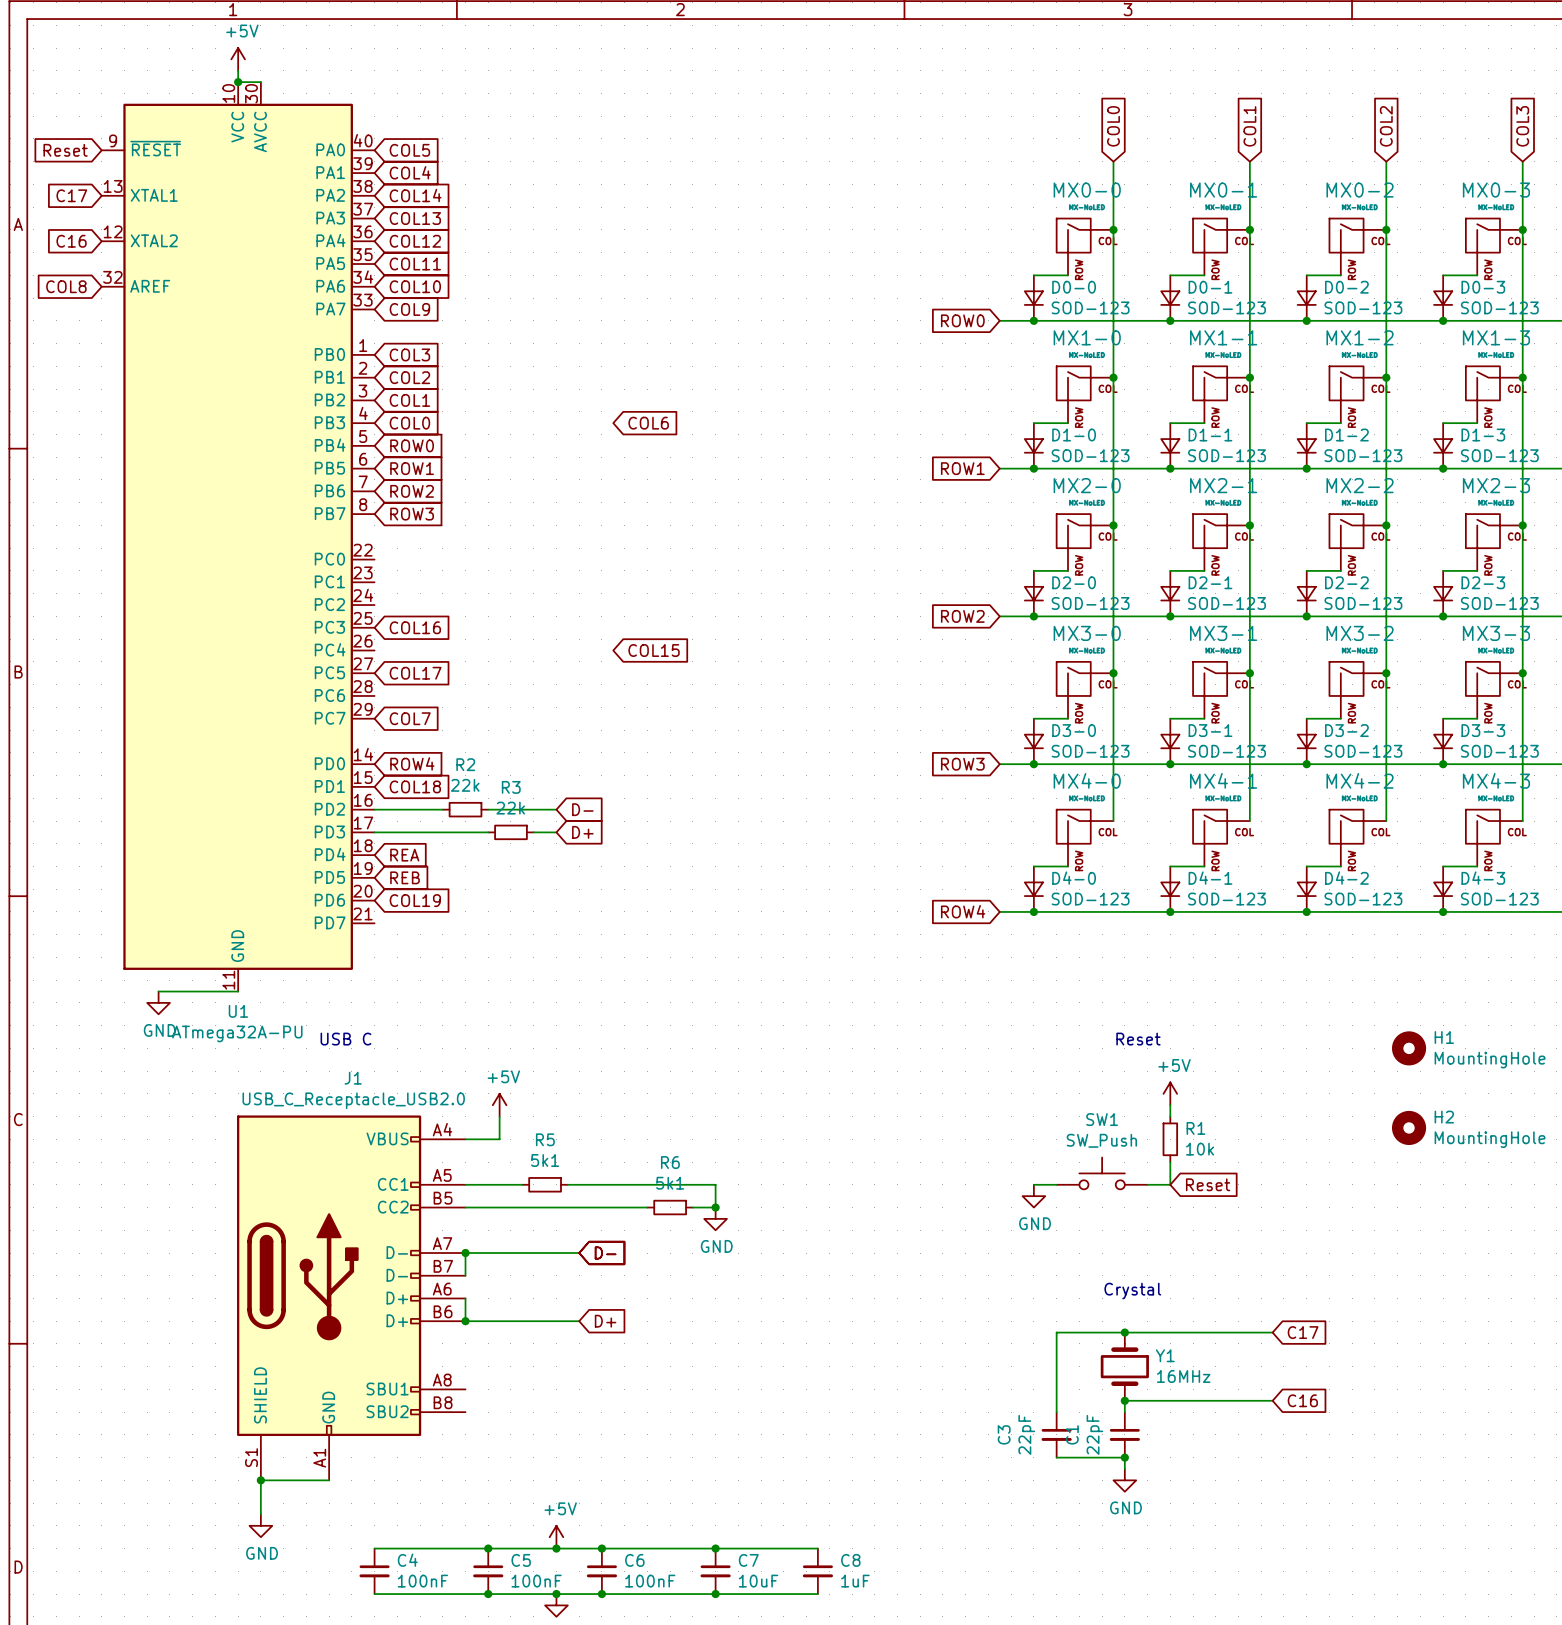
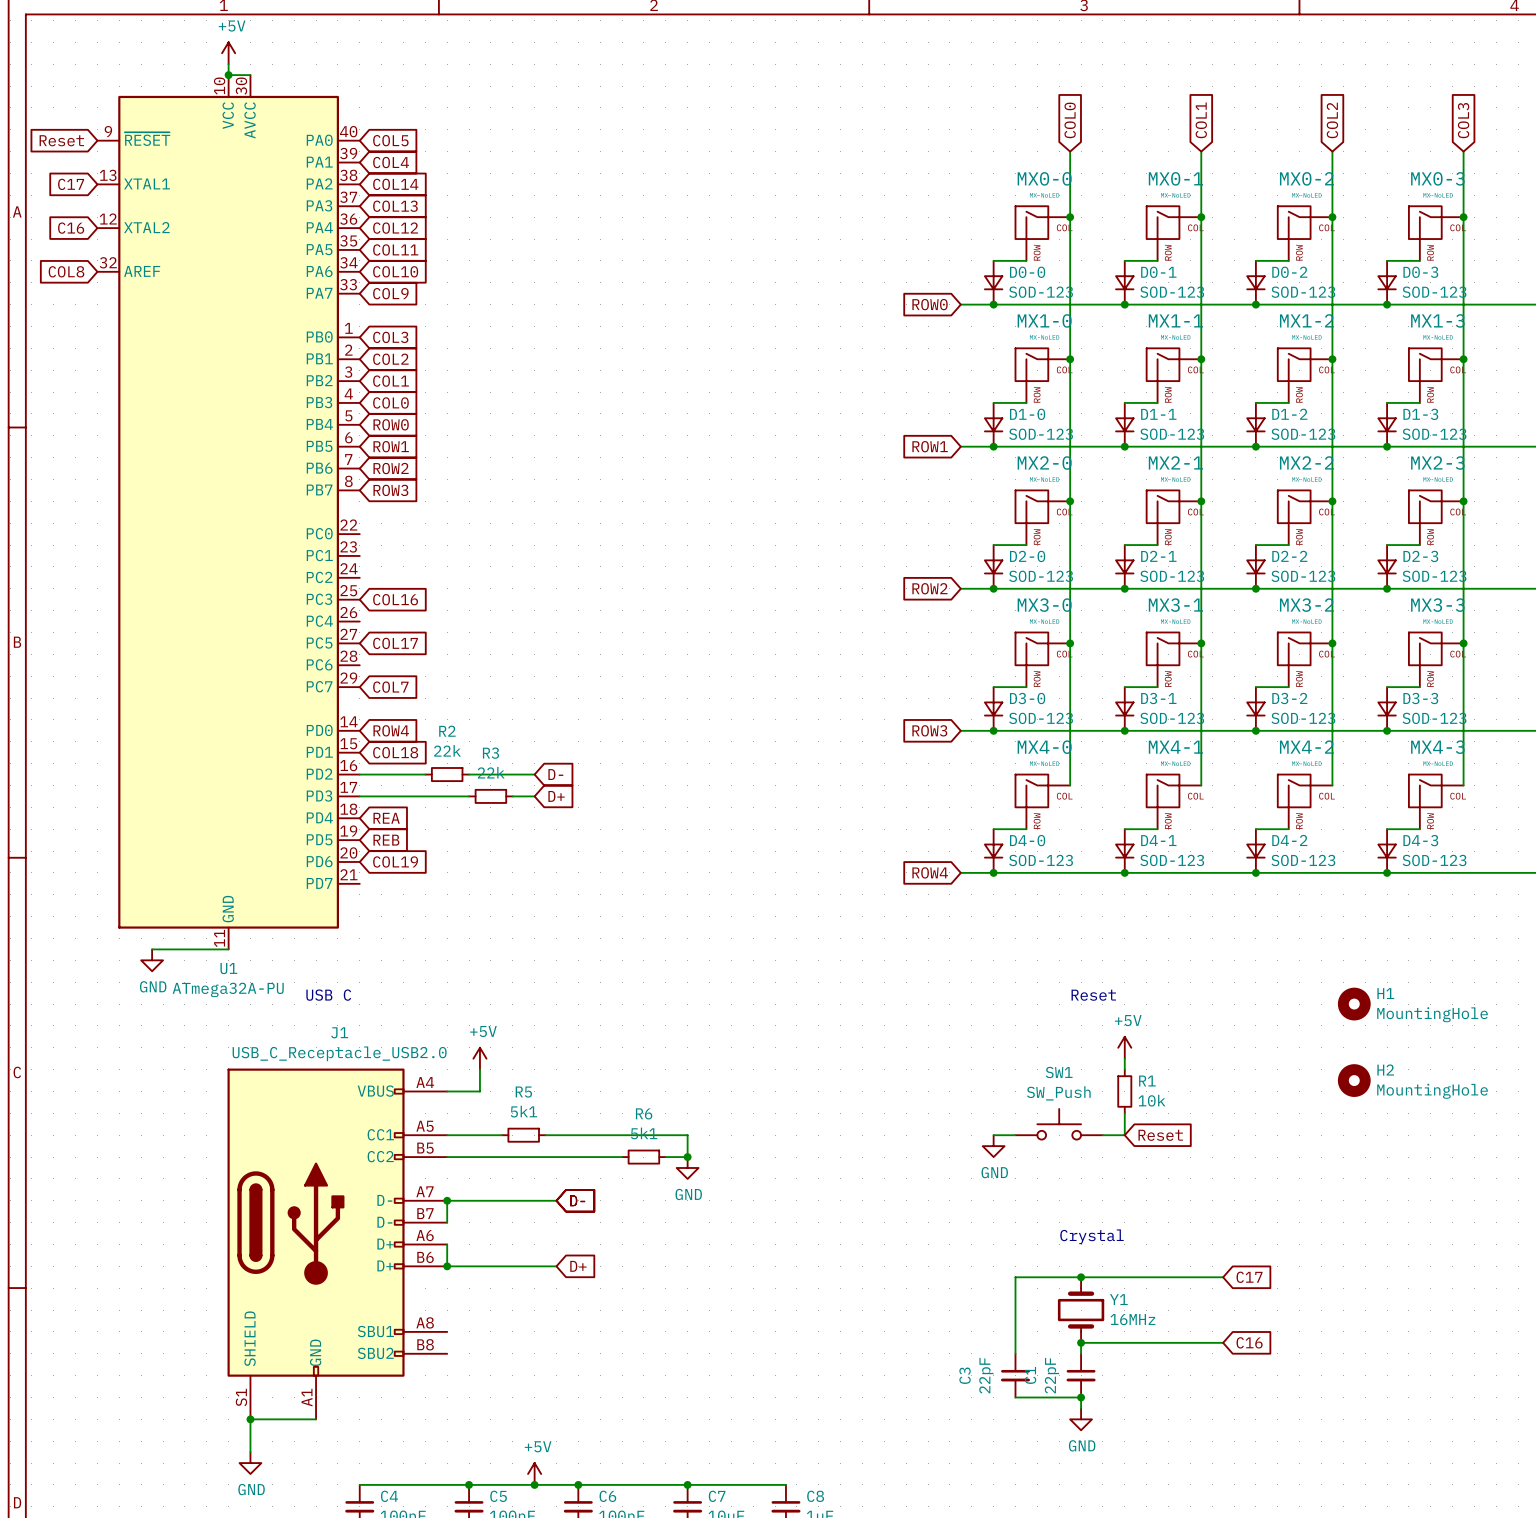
global label: COL6 (648, 423) -> none
global label: COL15 (654, 650) -> none

